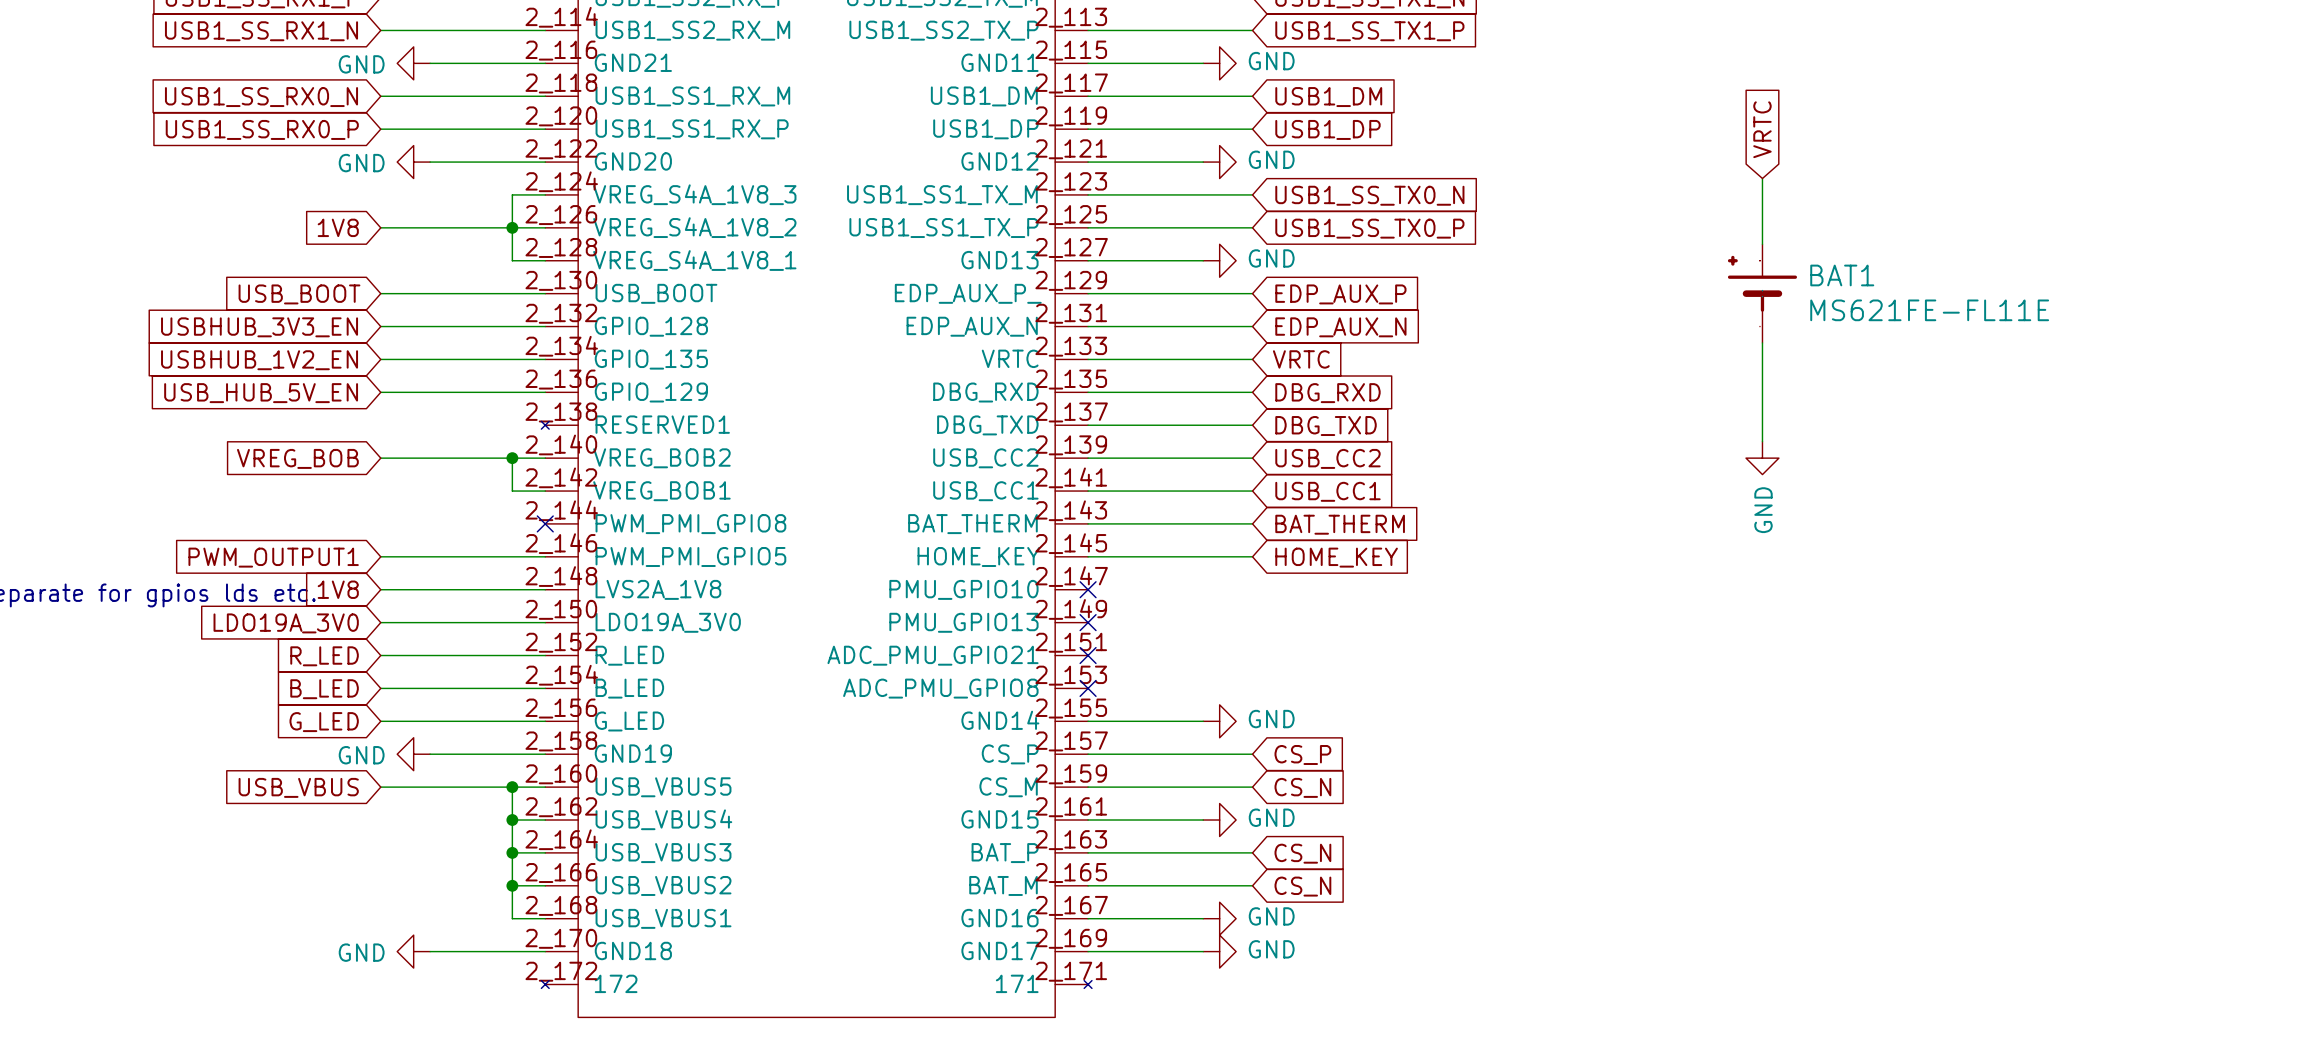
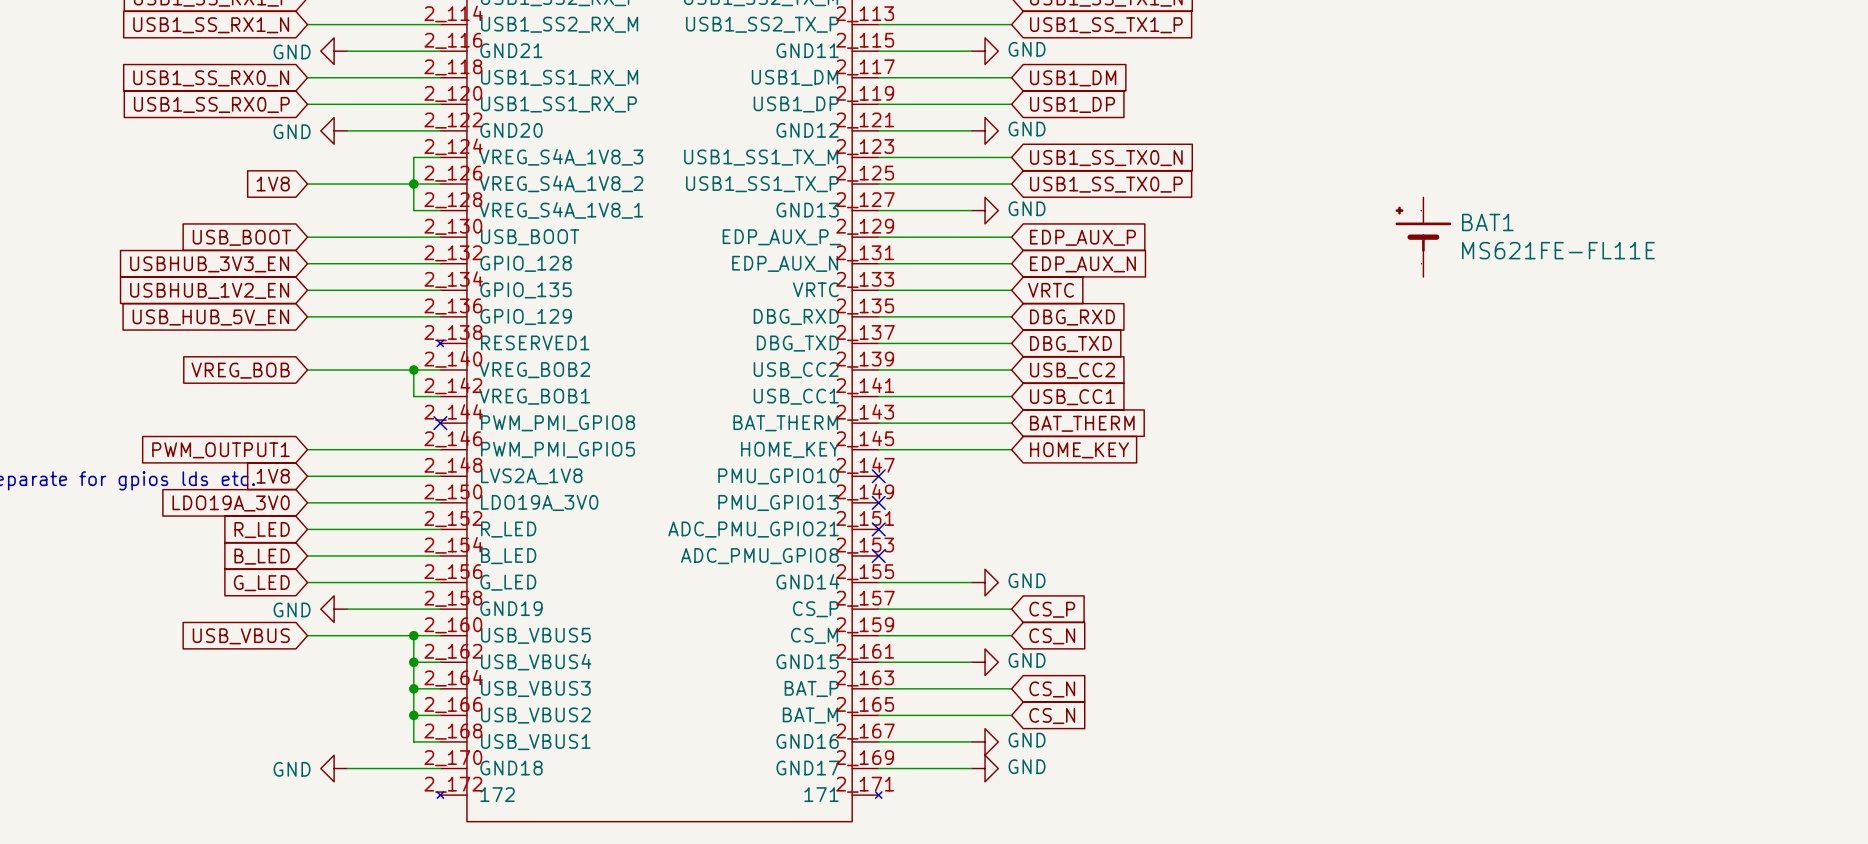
global label: VRTC (1762, 129) -> none
wire: (1762, 178) (1762, 244) -> none
wire: (1762, 342) (1762, 441) -> none
power symbol: GND (1762, 458) -> none

